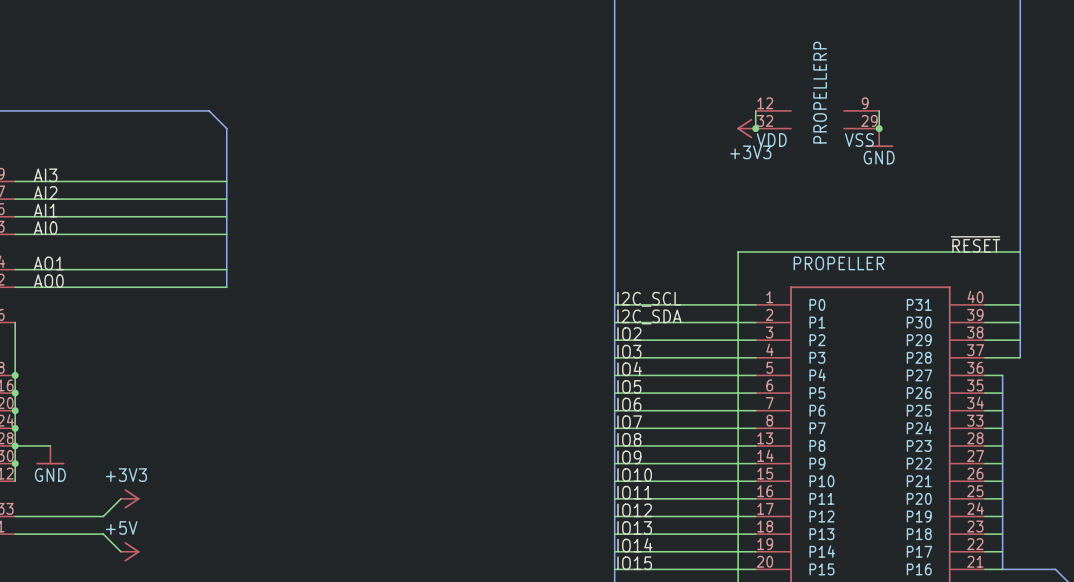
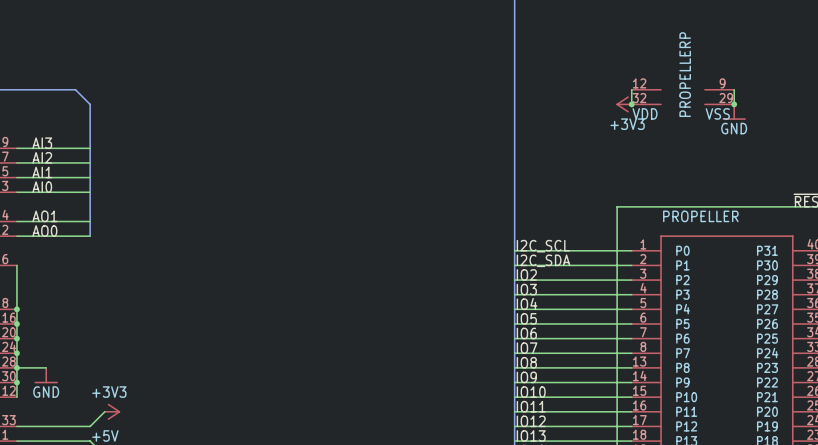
bus: (85, 110) (209, 110) (226, 128) (226, 287) -> (75, 89) (90, 104) (90, 236)
wire: (103, 181) (226, 181) -> none
wire: (103, 199) (226, 199) -> none
wire: (103, 216) (226, 216) -> none
wire: (103, 234) (226, 234) -> none
wire: (103, 269) (226, 269) -> none
wire: (103, 287) (226, 287) -> none

